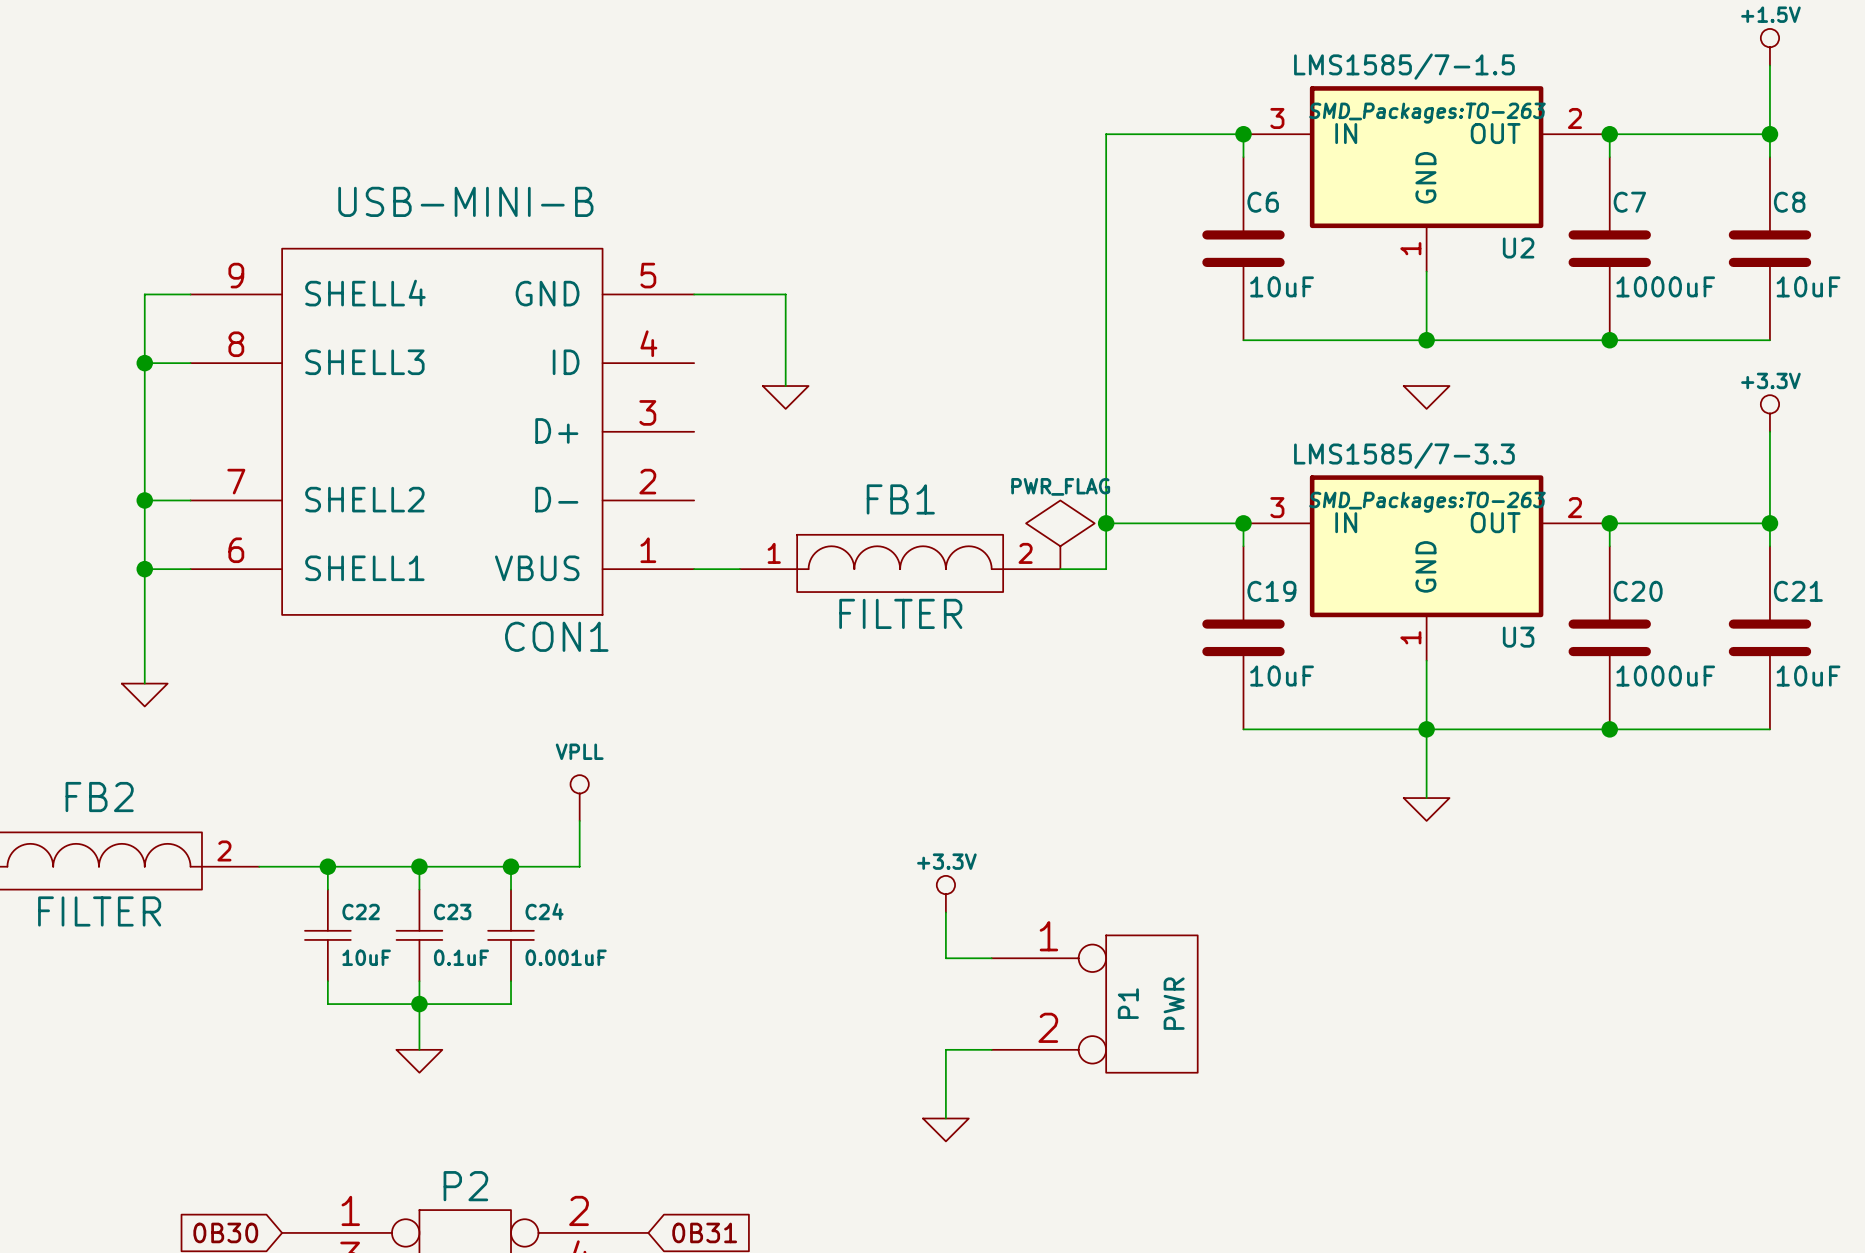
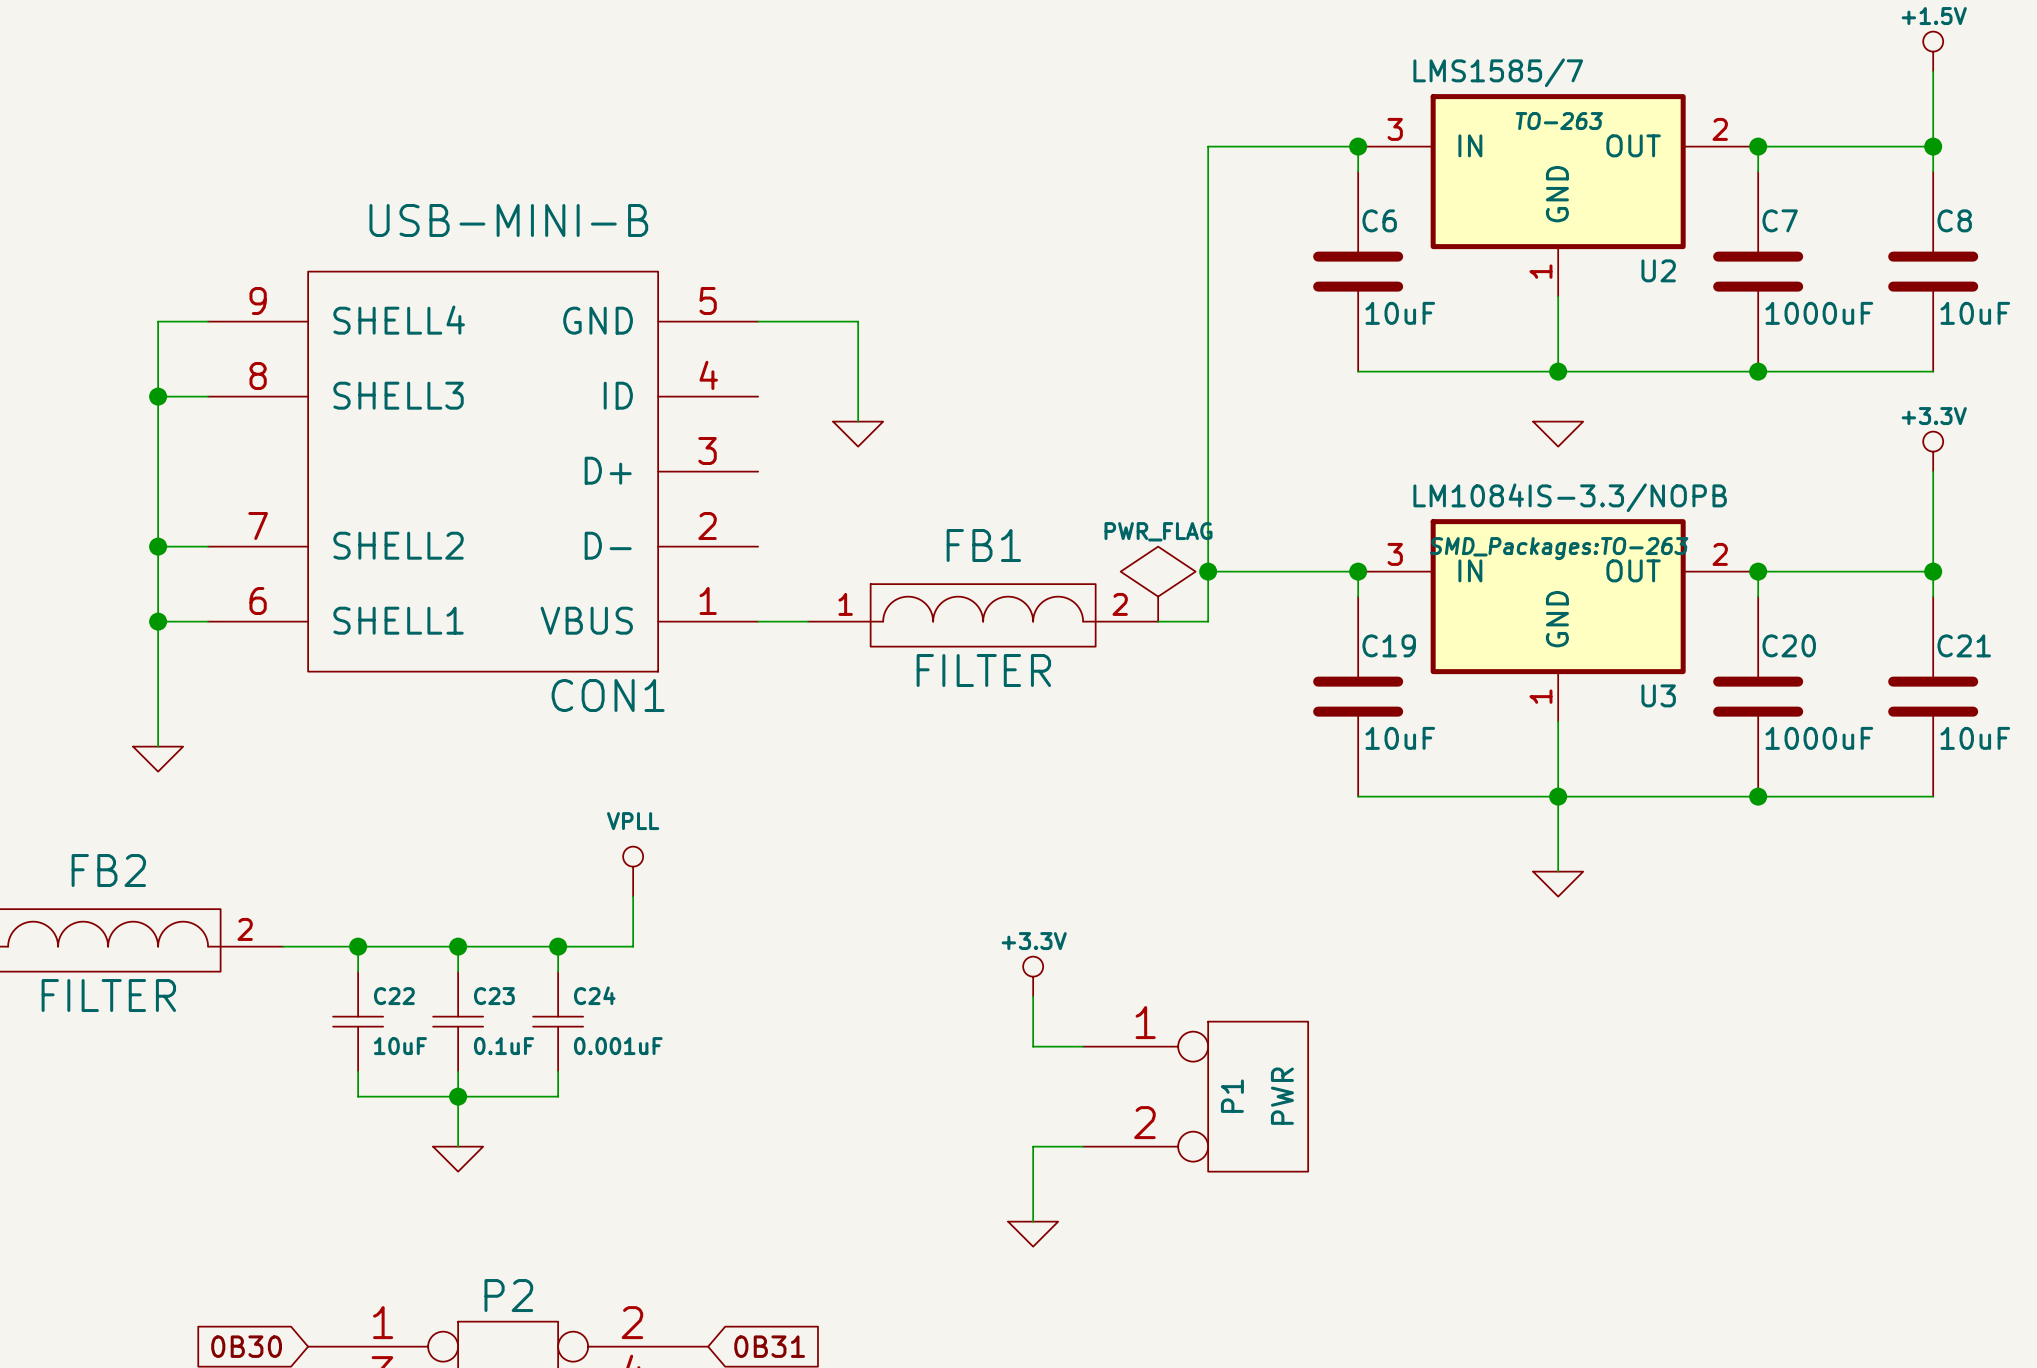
U2 value: LMS1585/7-1.5 (1404, 66) -> LMS1585/7 (1498, 72)
U2 text: SMD_Packages:TO-263 (1427, 113) -> TO-263 (1559, 121)
U3 value: LMS1585/7-3.3 (1404, 455) -> LM1084IS-3.3/NOPB (1570, 497)

